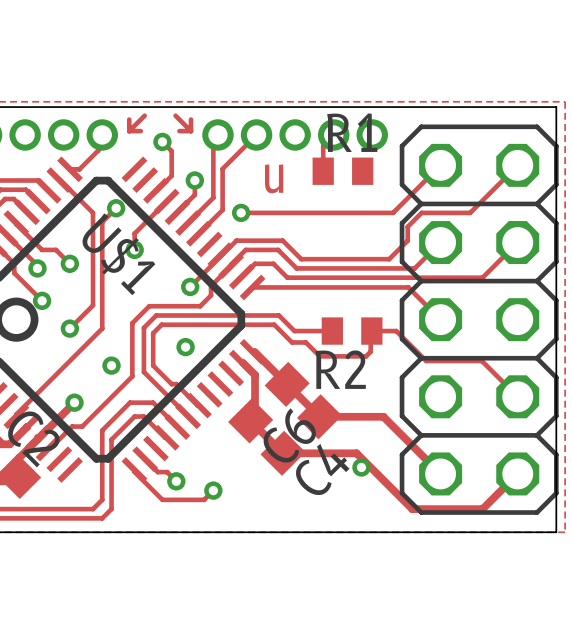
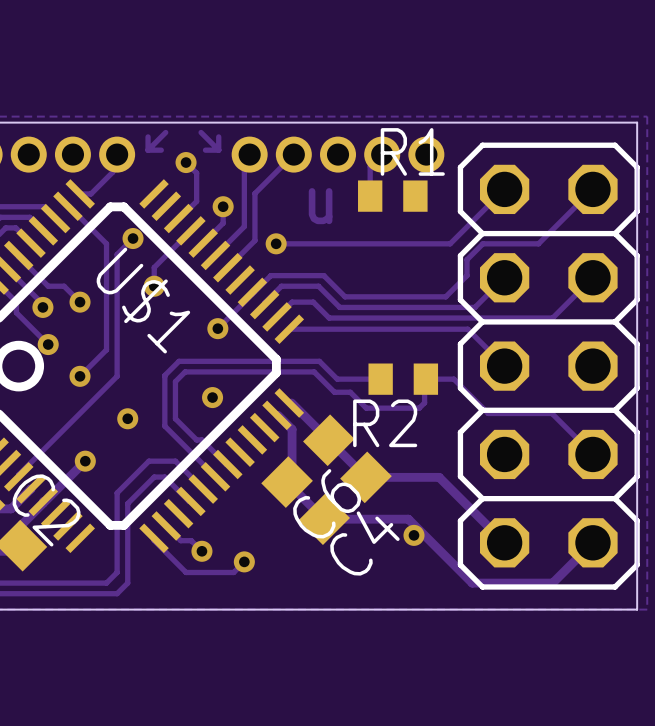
track: (231, 265) (211, 286) (211, 295) (200, 306) (149, 306) (132, 323) (132, 376) (82, 426) (72, 426) (48, 448) -> none

